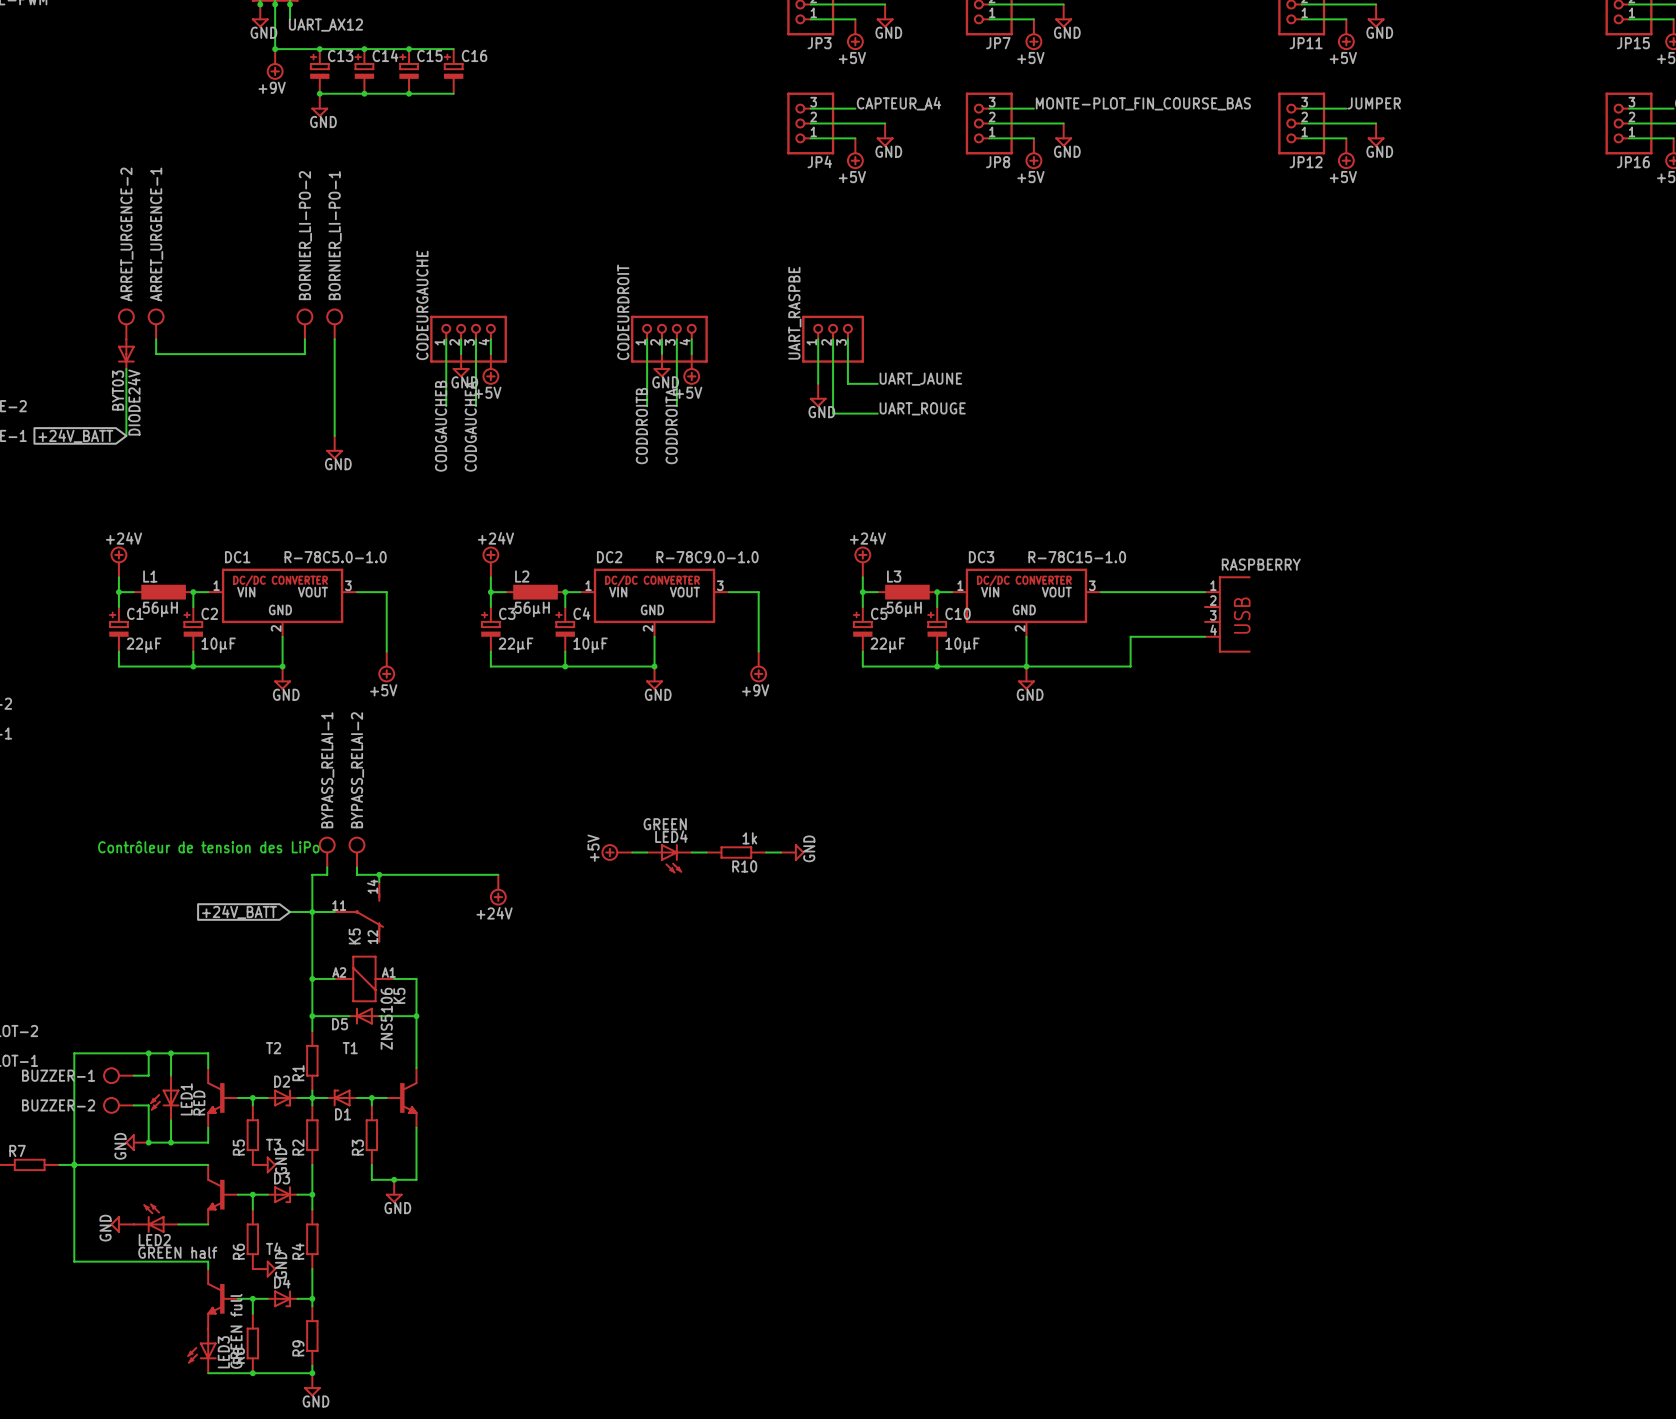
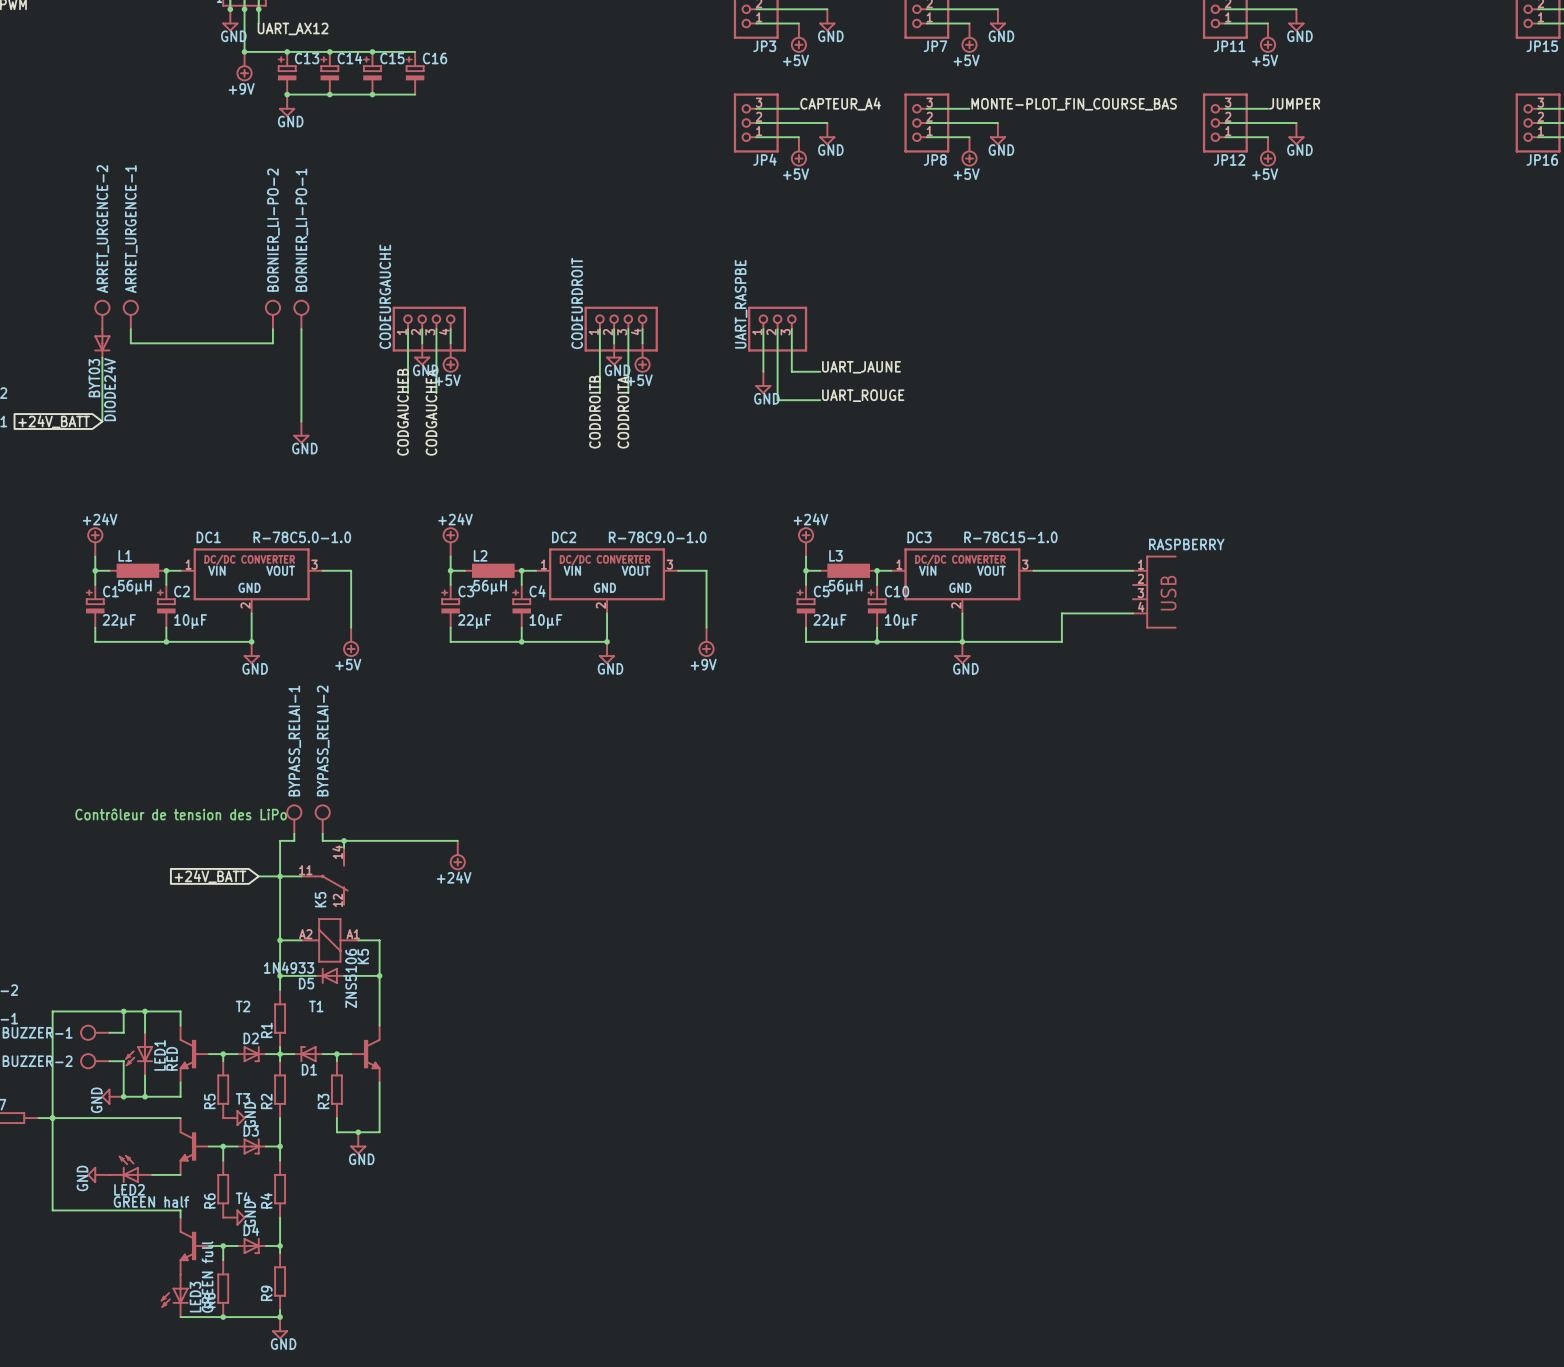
power symbol: +5V (616, 852) -> none
wire: (632, 852) (647, 852) -> none
wire: (691, 852) (706, 852) -> none
R10: 1k (736, 852) -> none
wire: (766, 852) (780, 852) -> none
power symbol: GND (792, 852) -> none
LED4: GREEN (669, 858) -> none
D5 value: none -> 1N4933 (289, 967)

